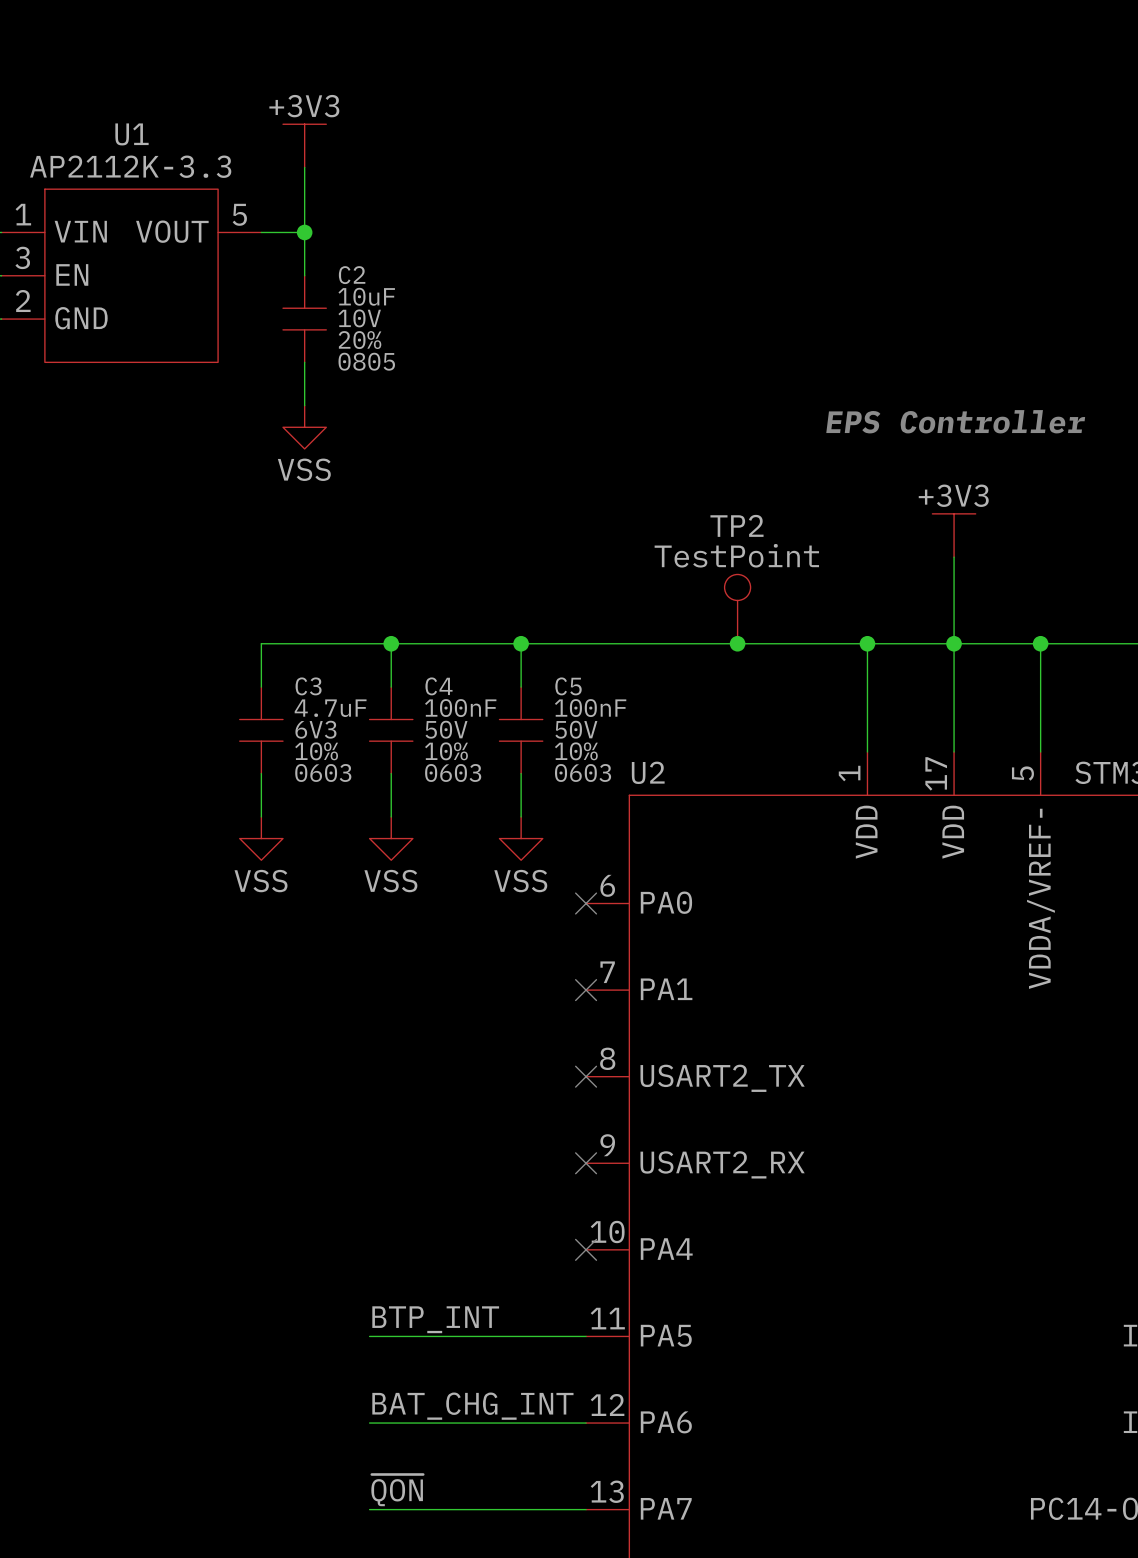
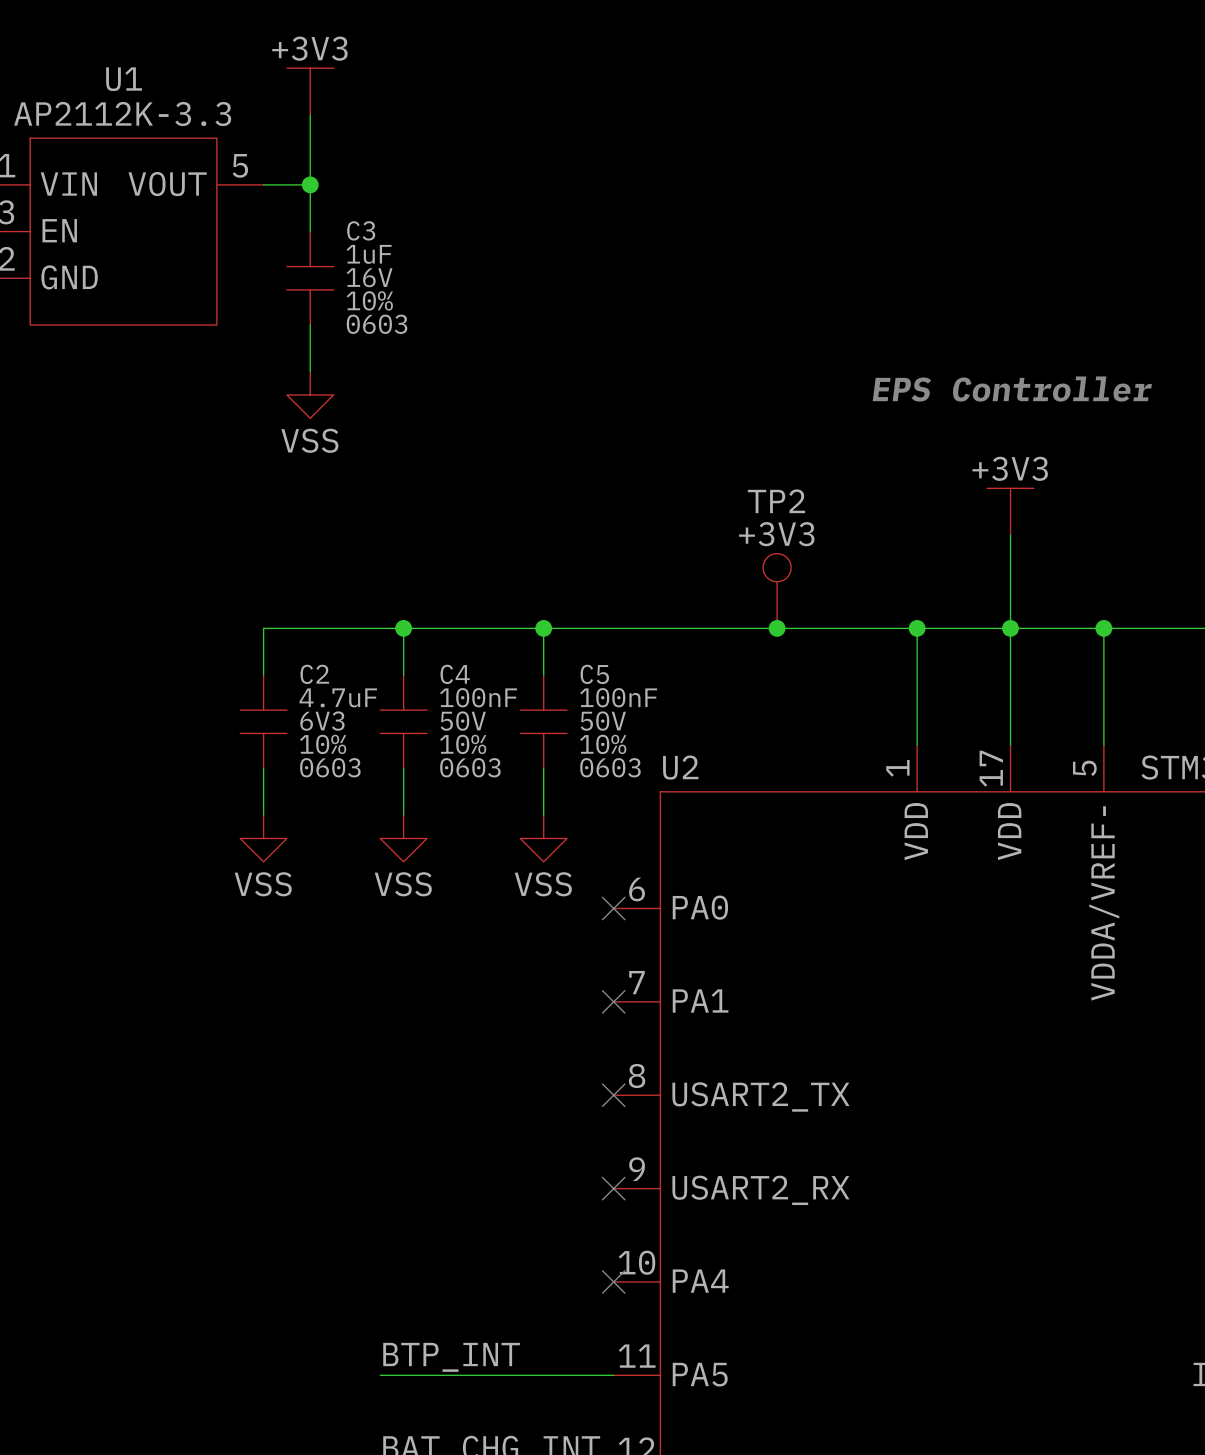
C2 name: C2 (352, 275) -> C3 (361, 230)
C2 value: 10uF (366, 296) -> 1uF (369, 254)
C2 text: 10V (359, 318) -> 16V (369, 277)
C2 text: 20% (360, 340) -> 10% (369, 300)
C2 text: 0805 (366, 361) -> 0603 (377, 324)
TP2 value: TestPoint (736, 555) -> +3V3 (776, 534)
C3 name: C3 (308, 686) -> C2 (314, 674)

